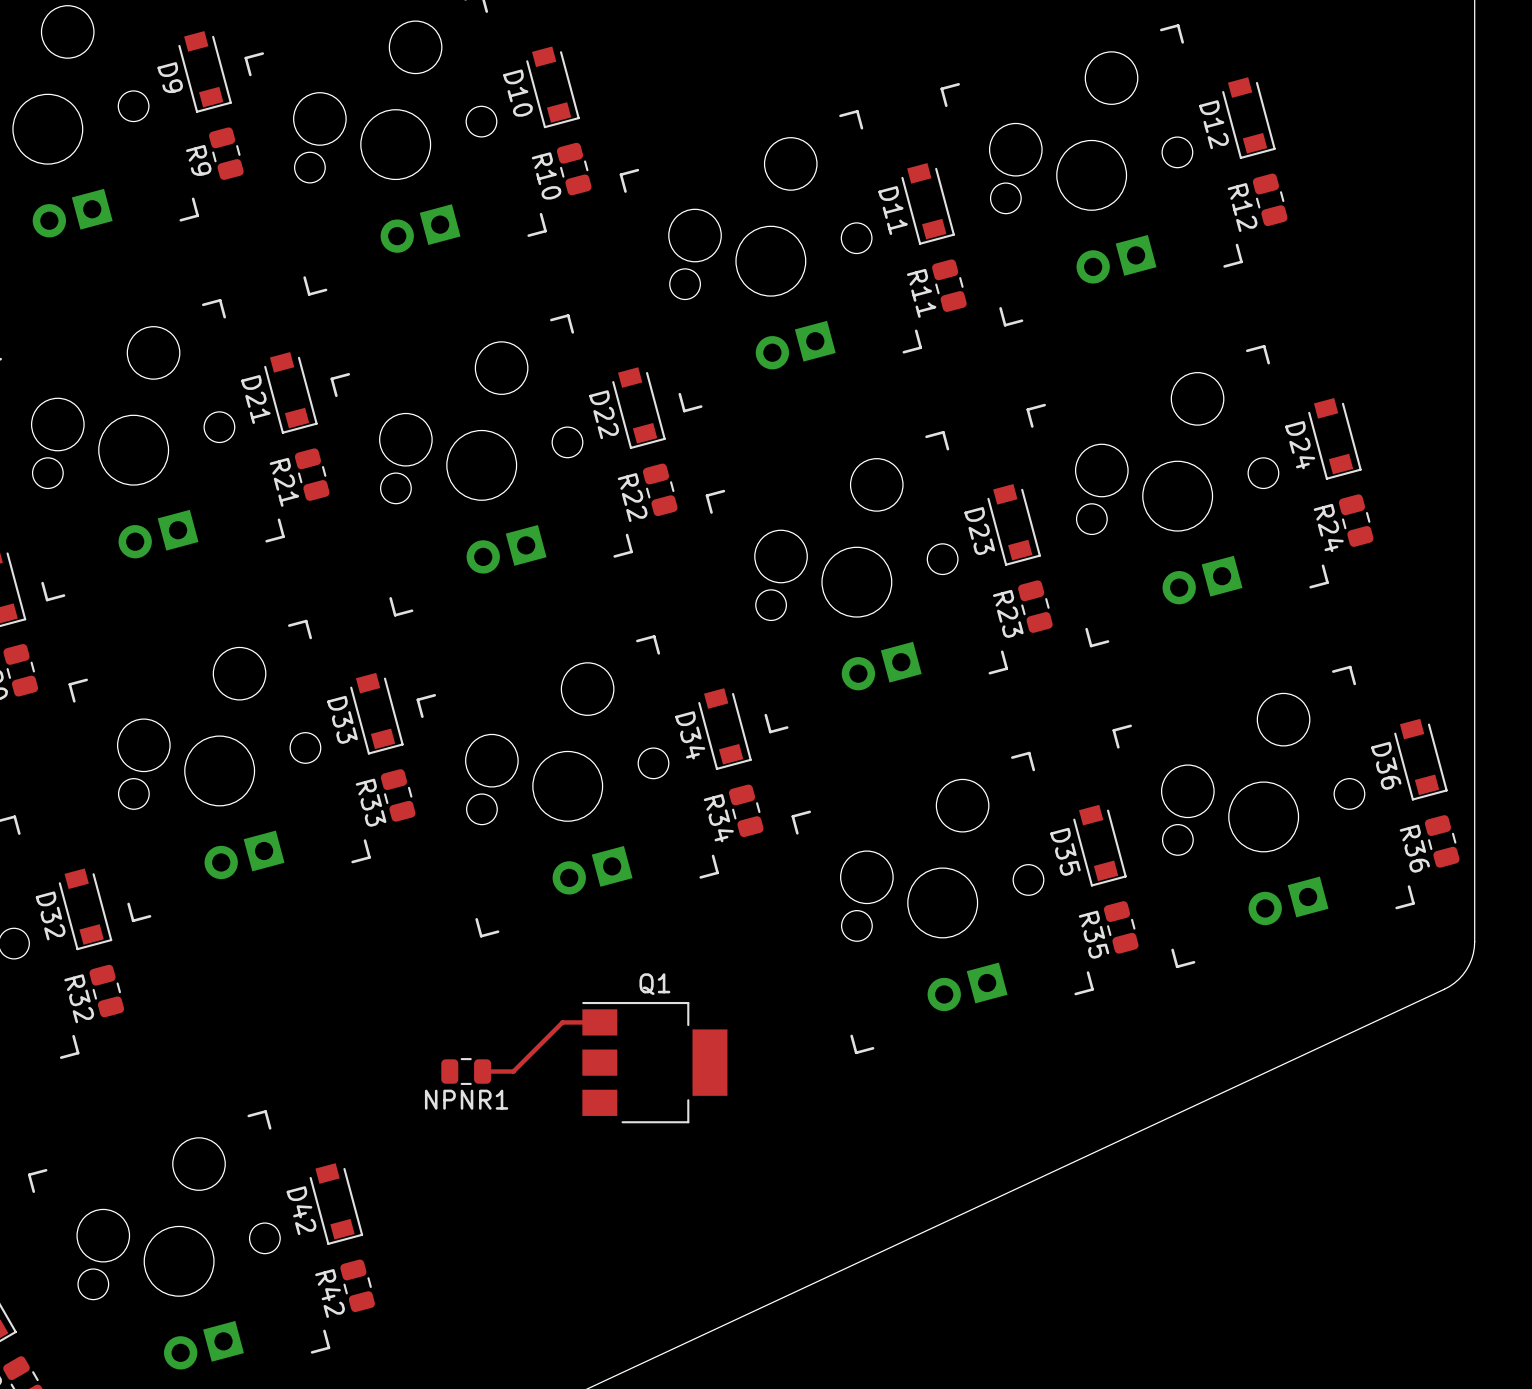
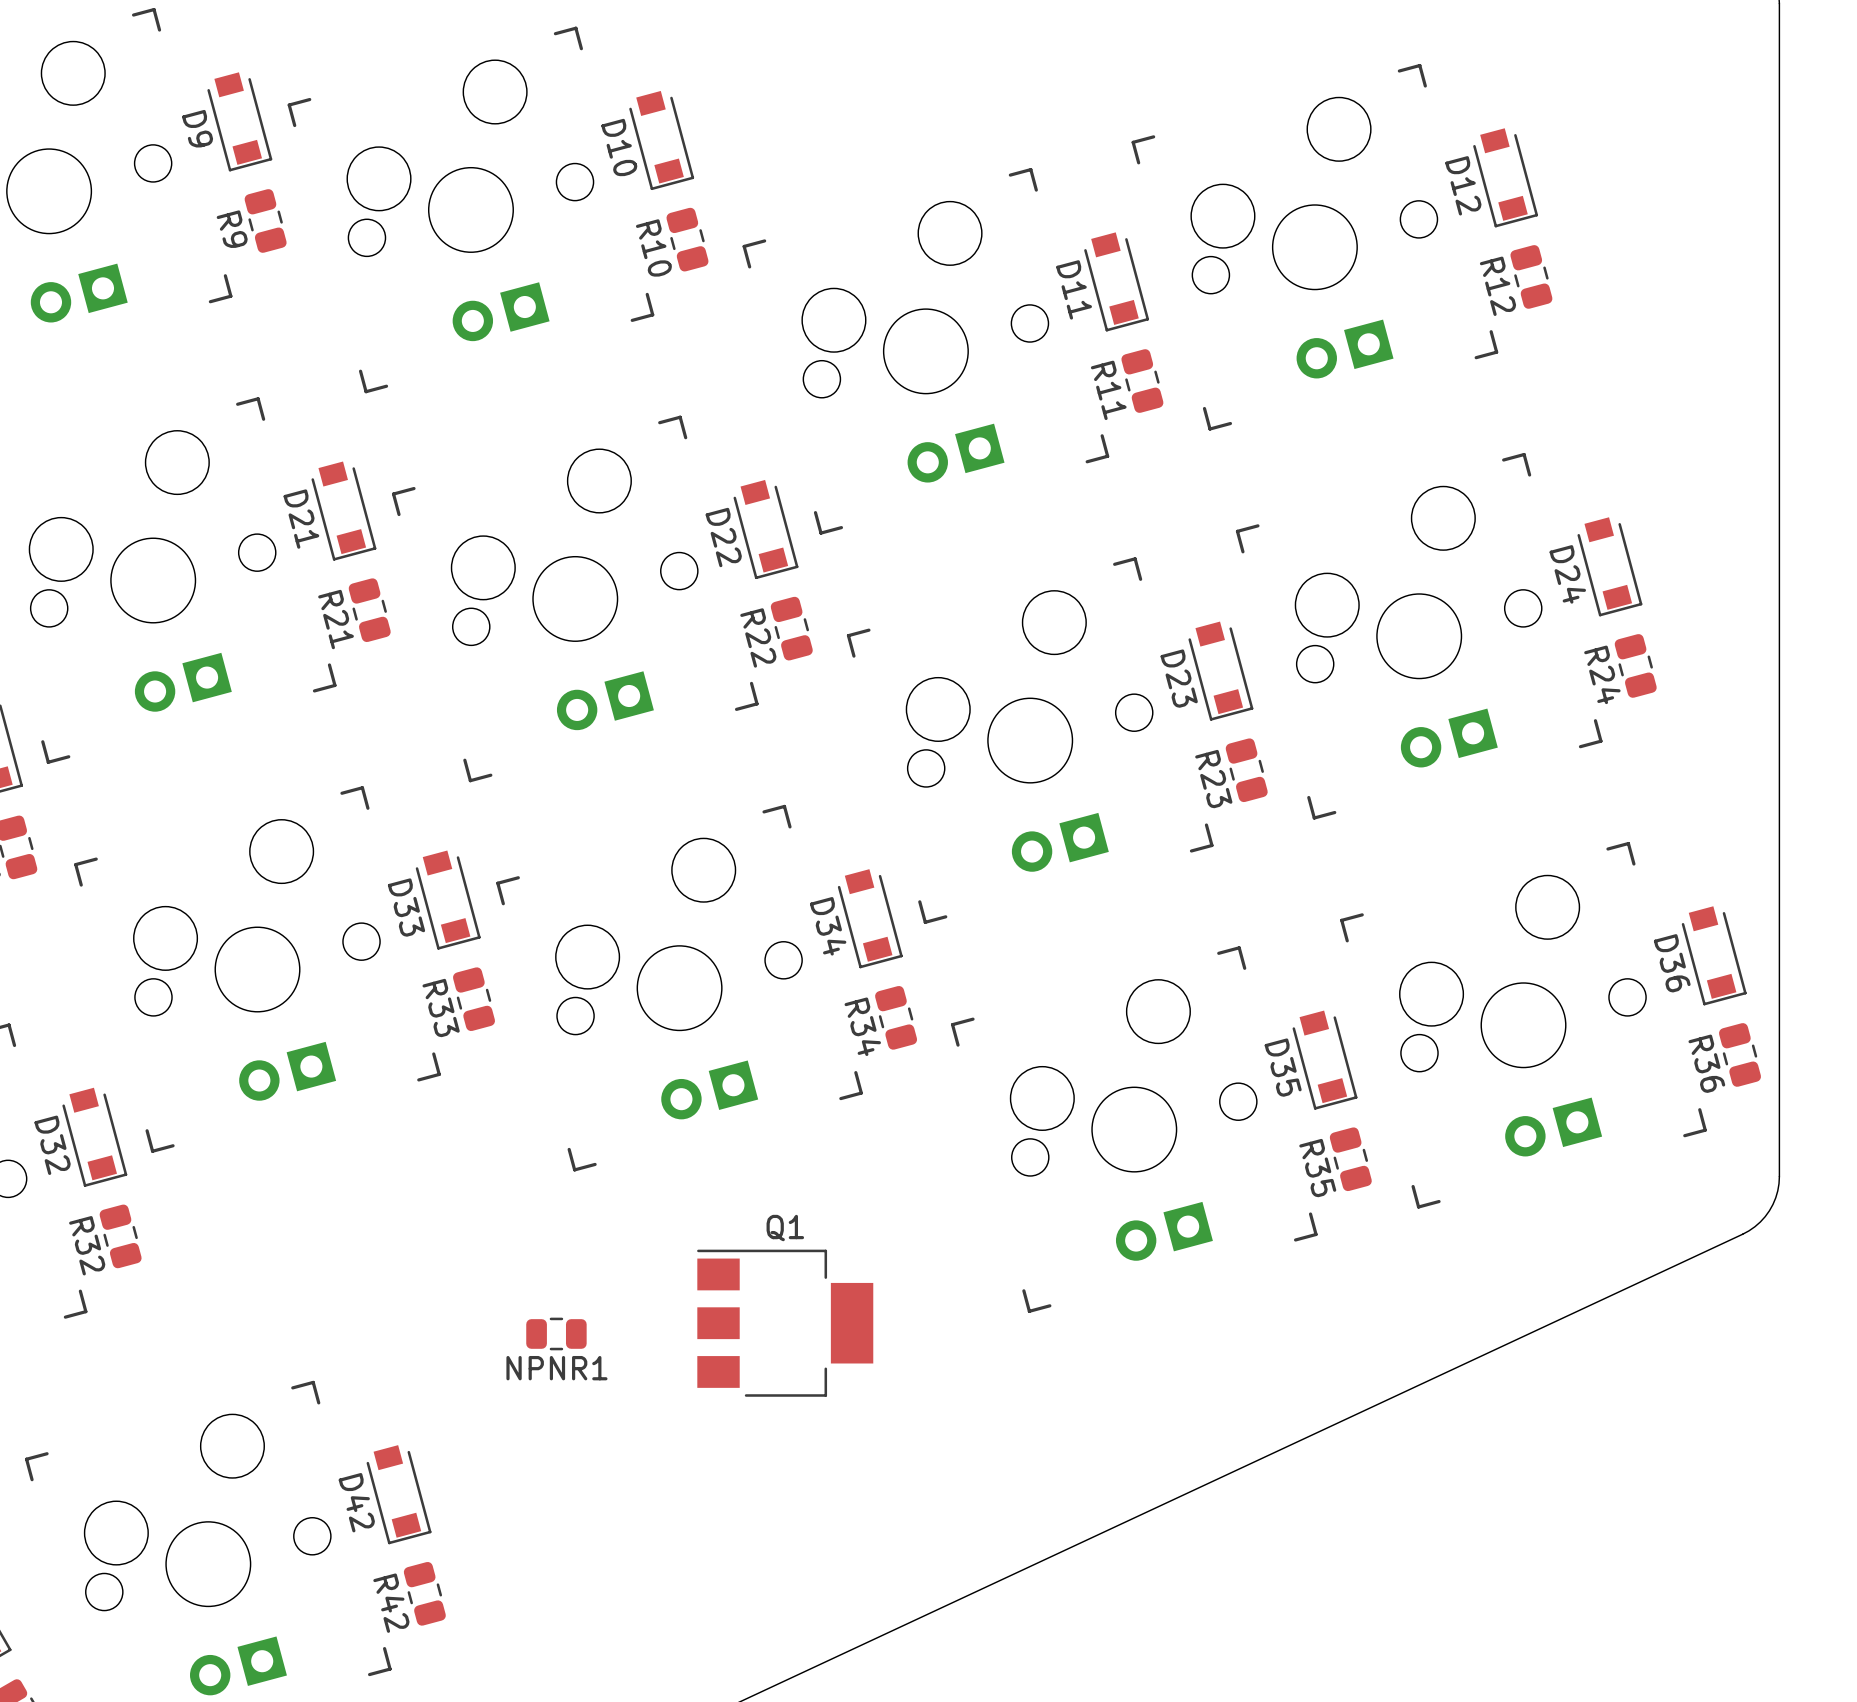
track: (599, 1022) (562, 1022) (513, 1071) (482, 1071) -> none

